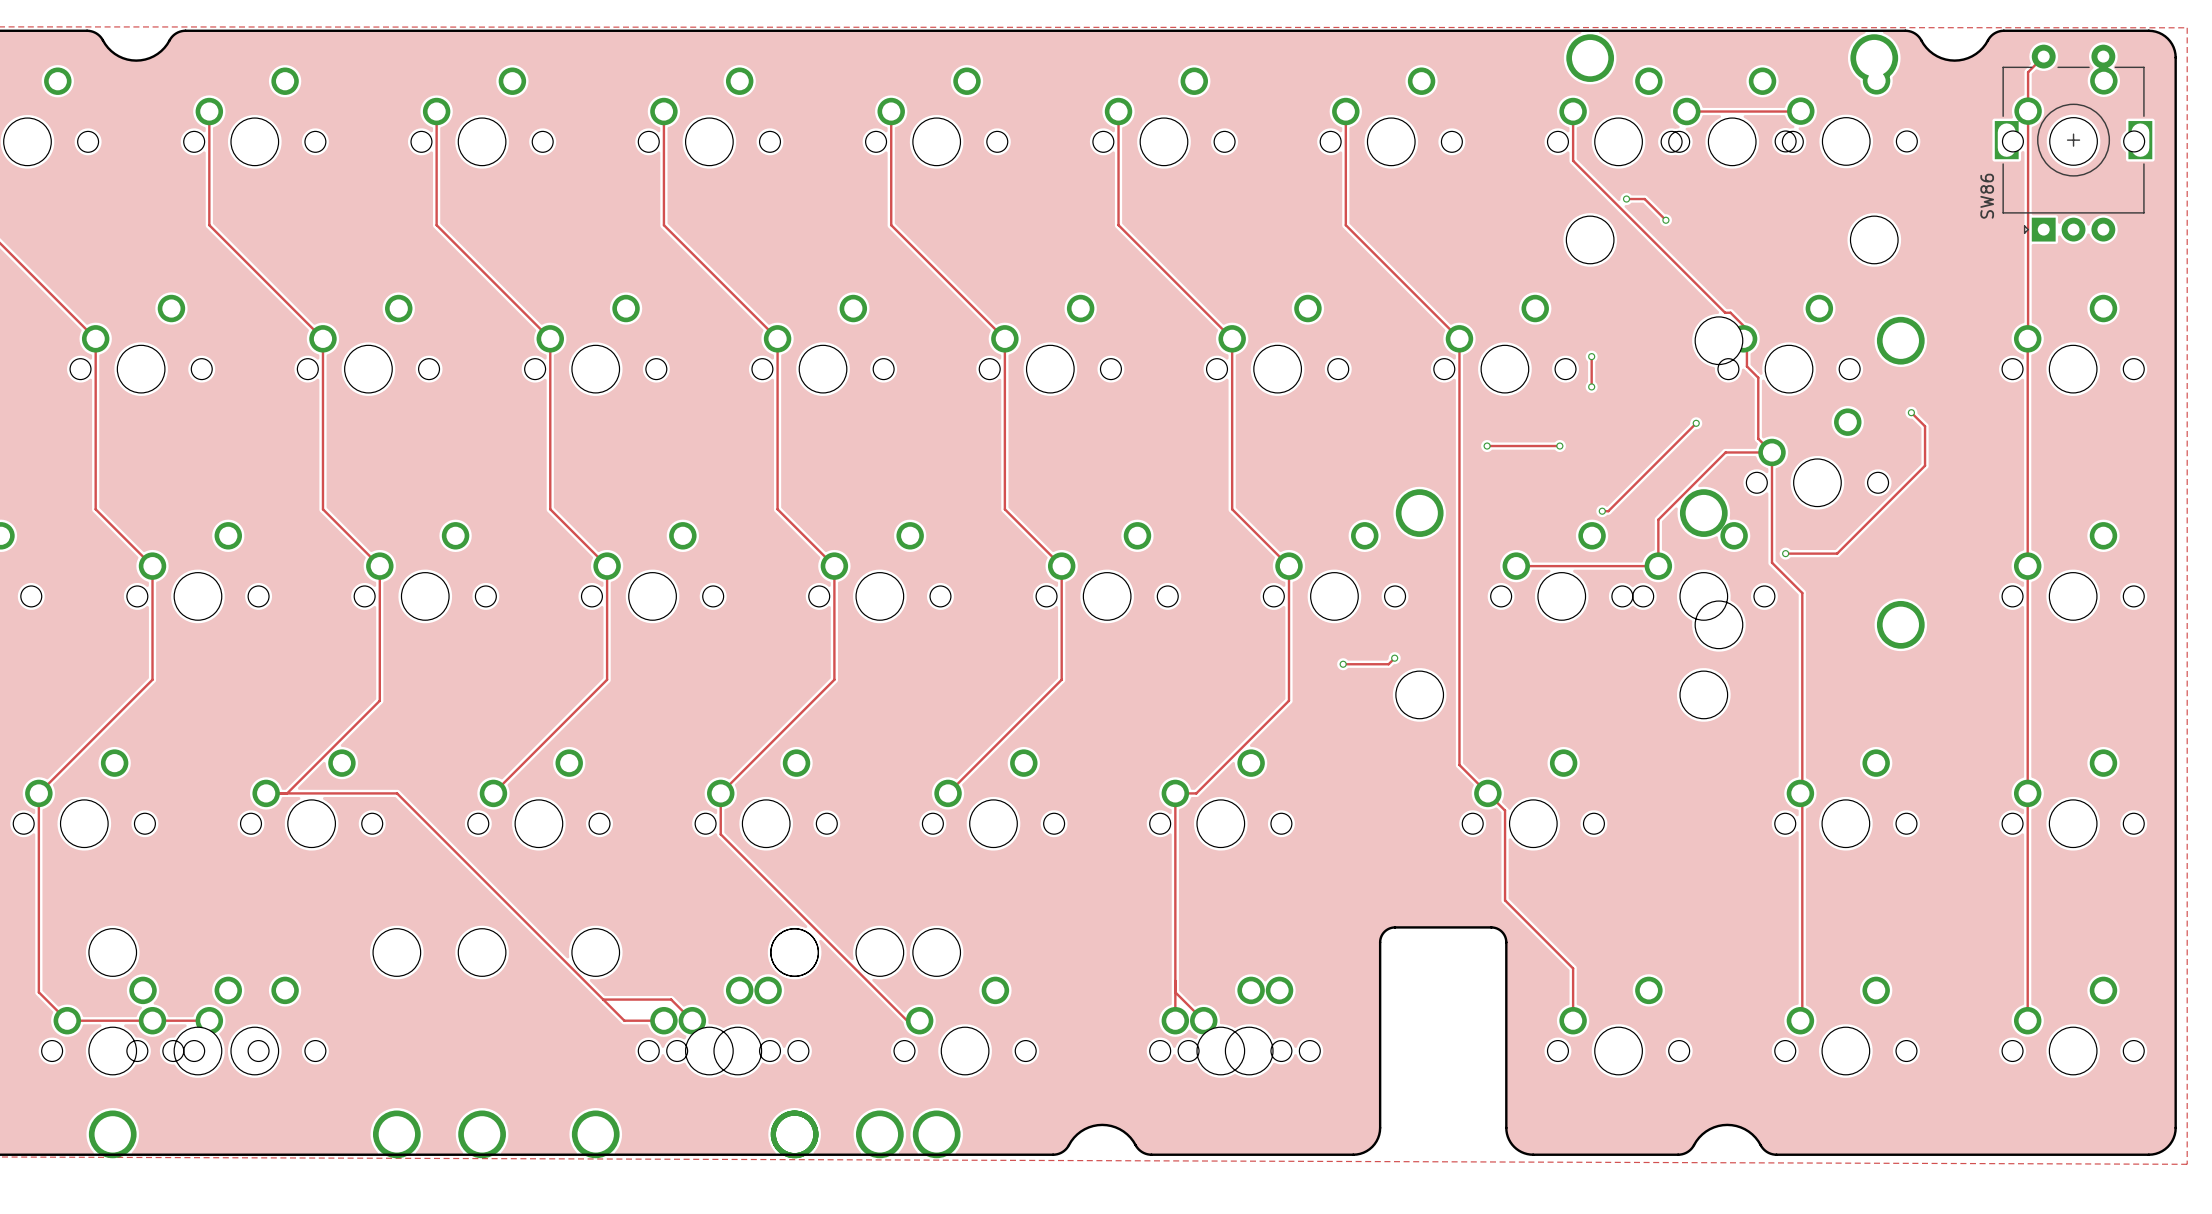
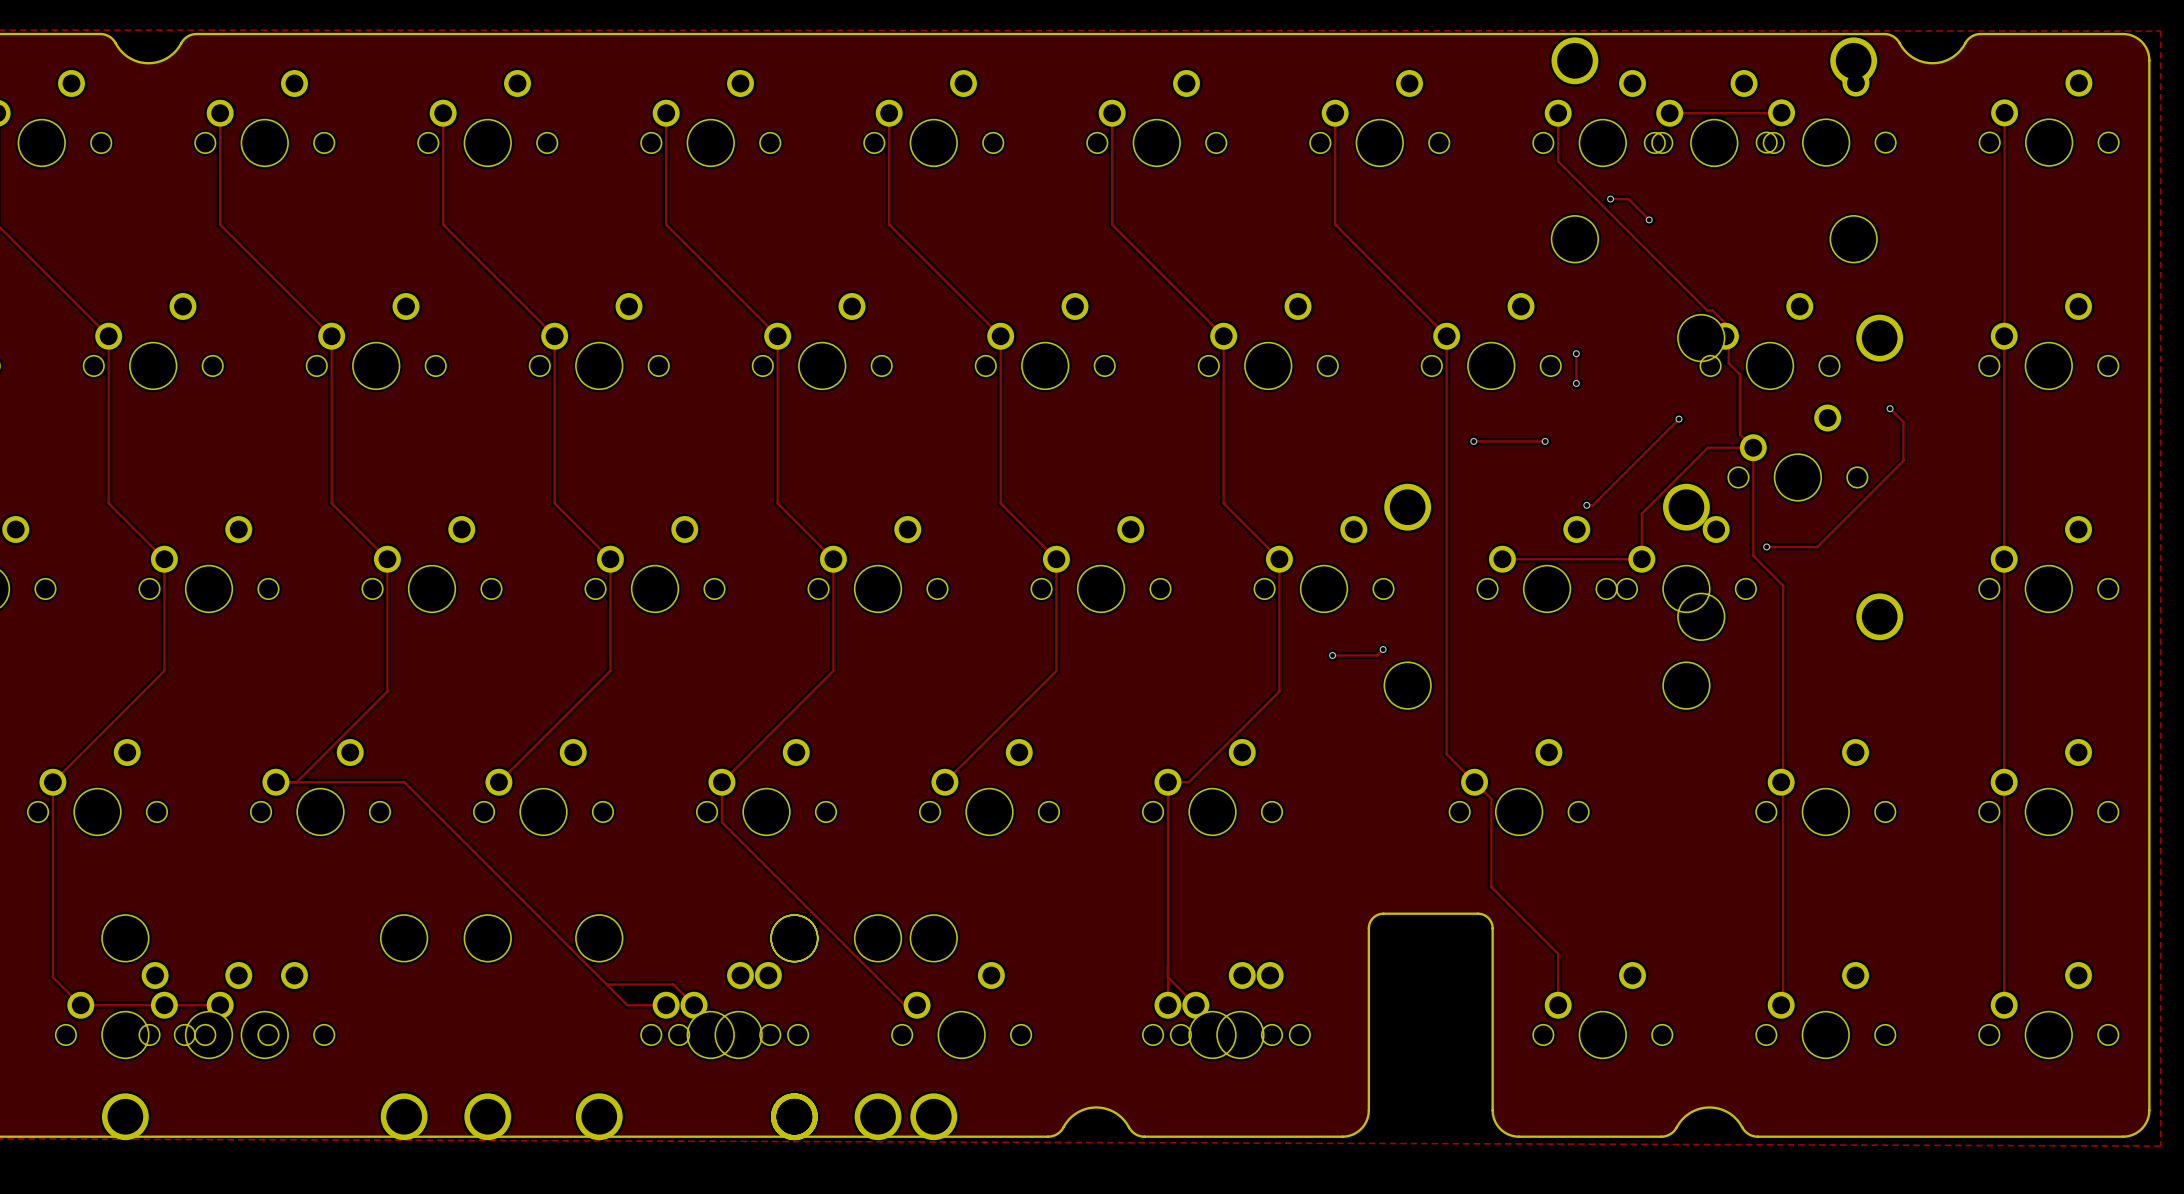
track: (2043, 56) (2028, 72) (2028, 111) -> none
SW86: (2073, 143) -> none

